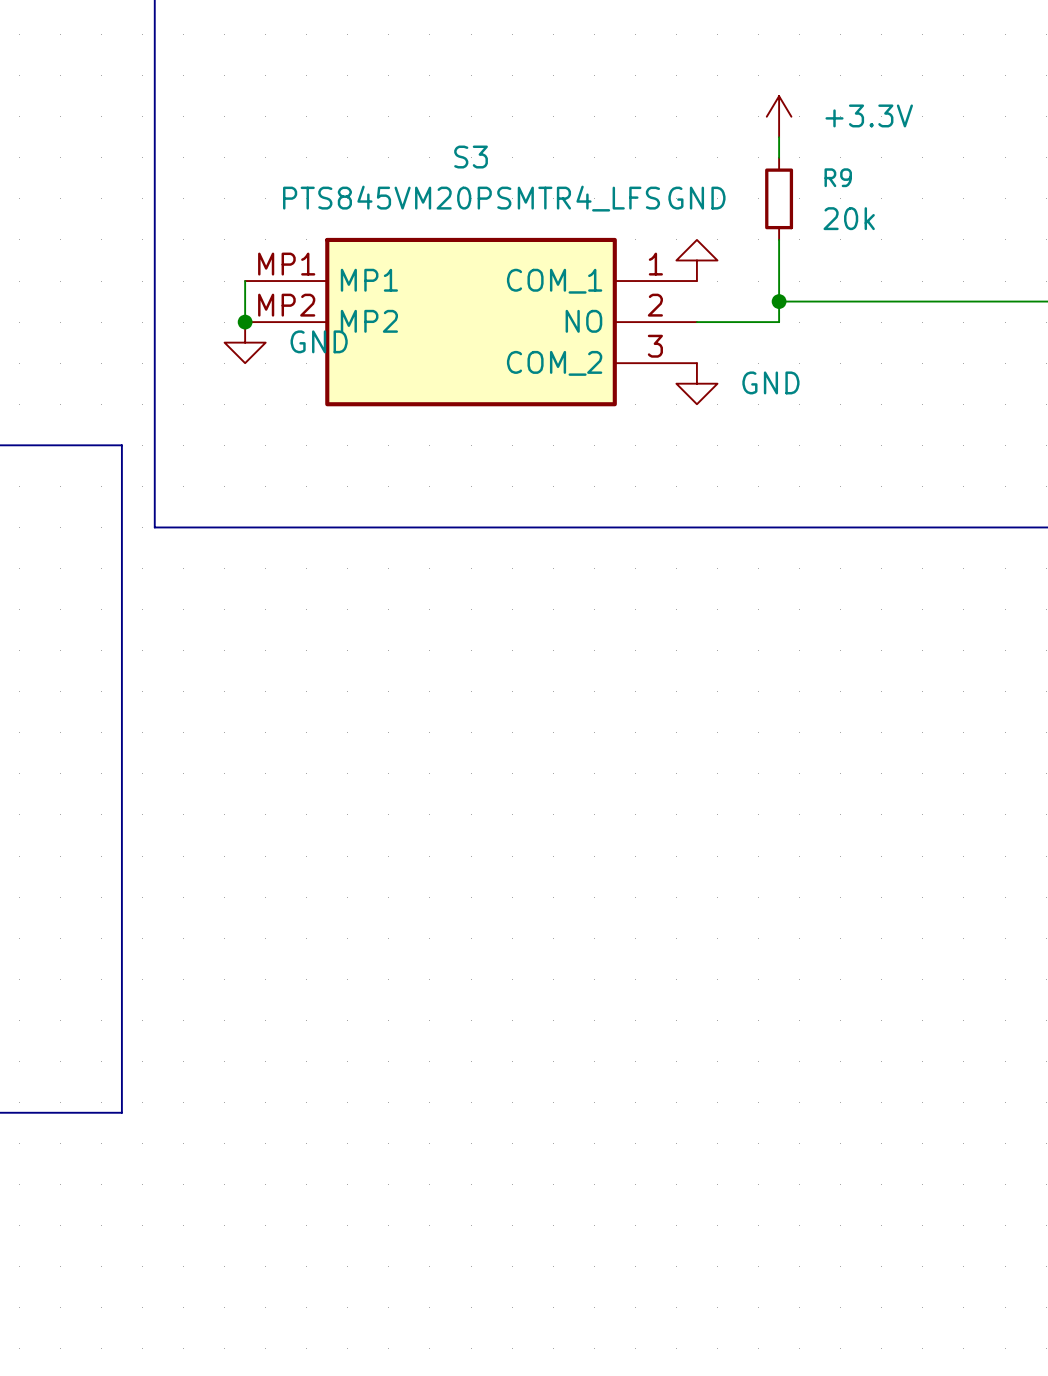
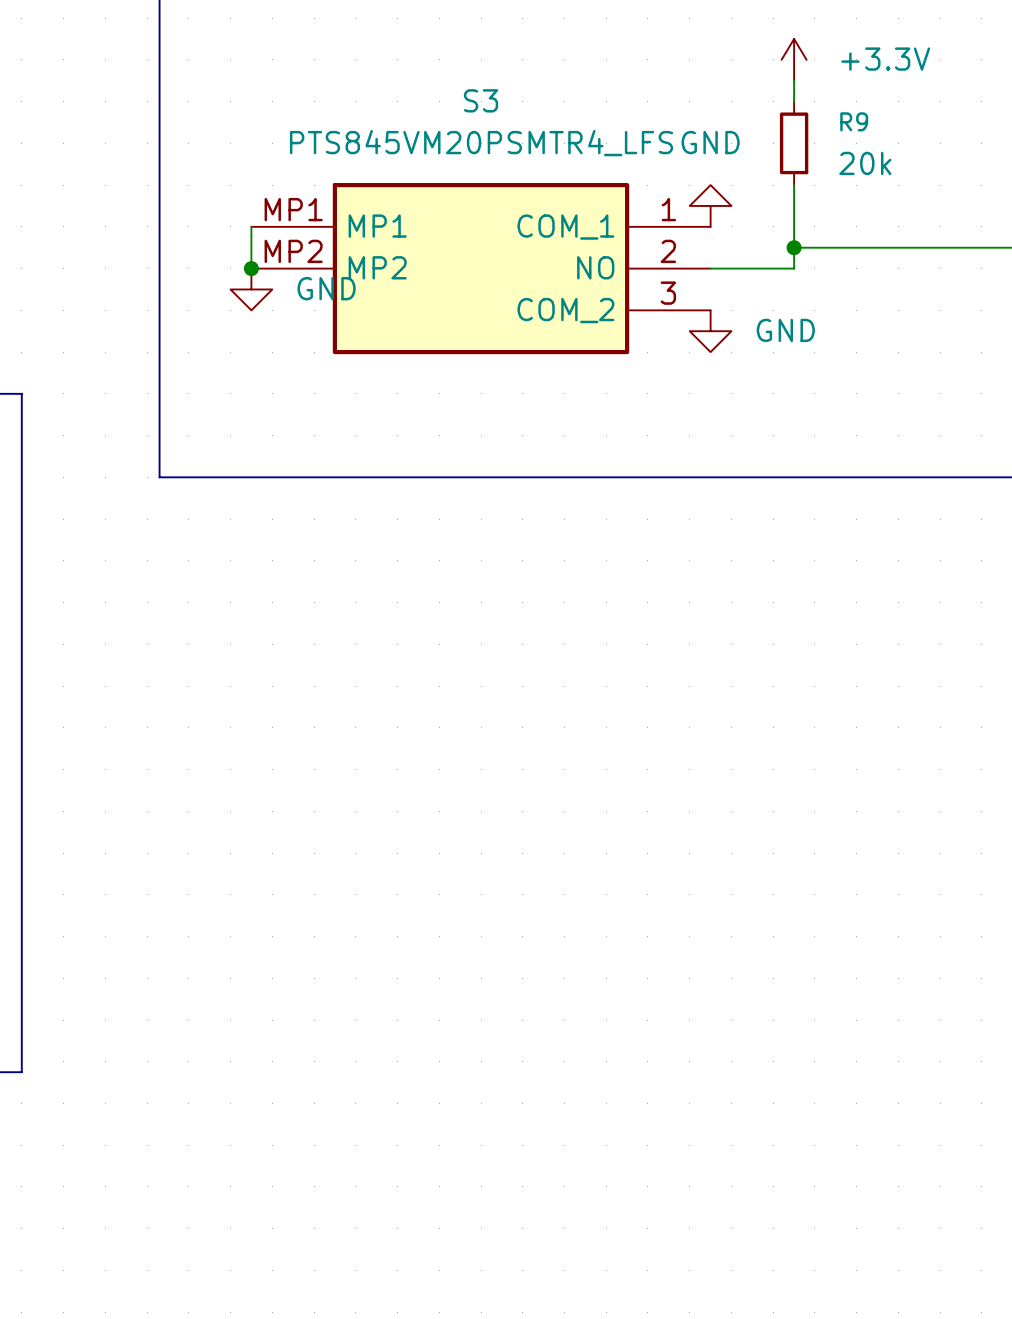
line: (19, 445) (121, 445) (121, 1112) (19, 1112) -> (21, 393) (21, 1072)

